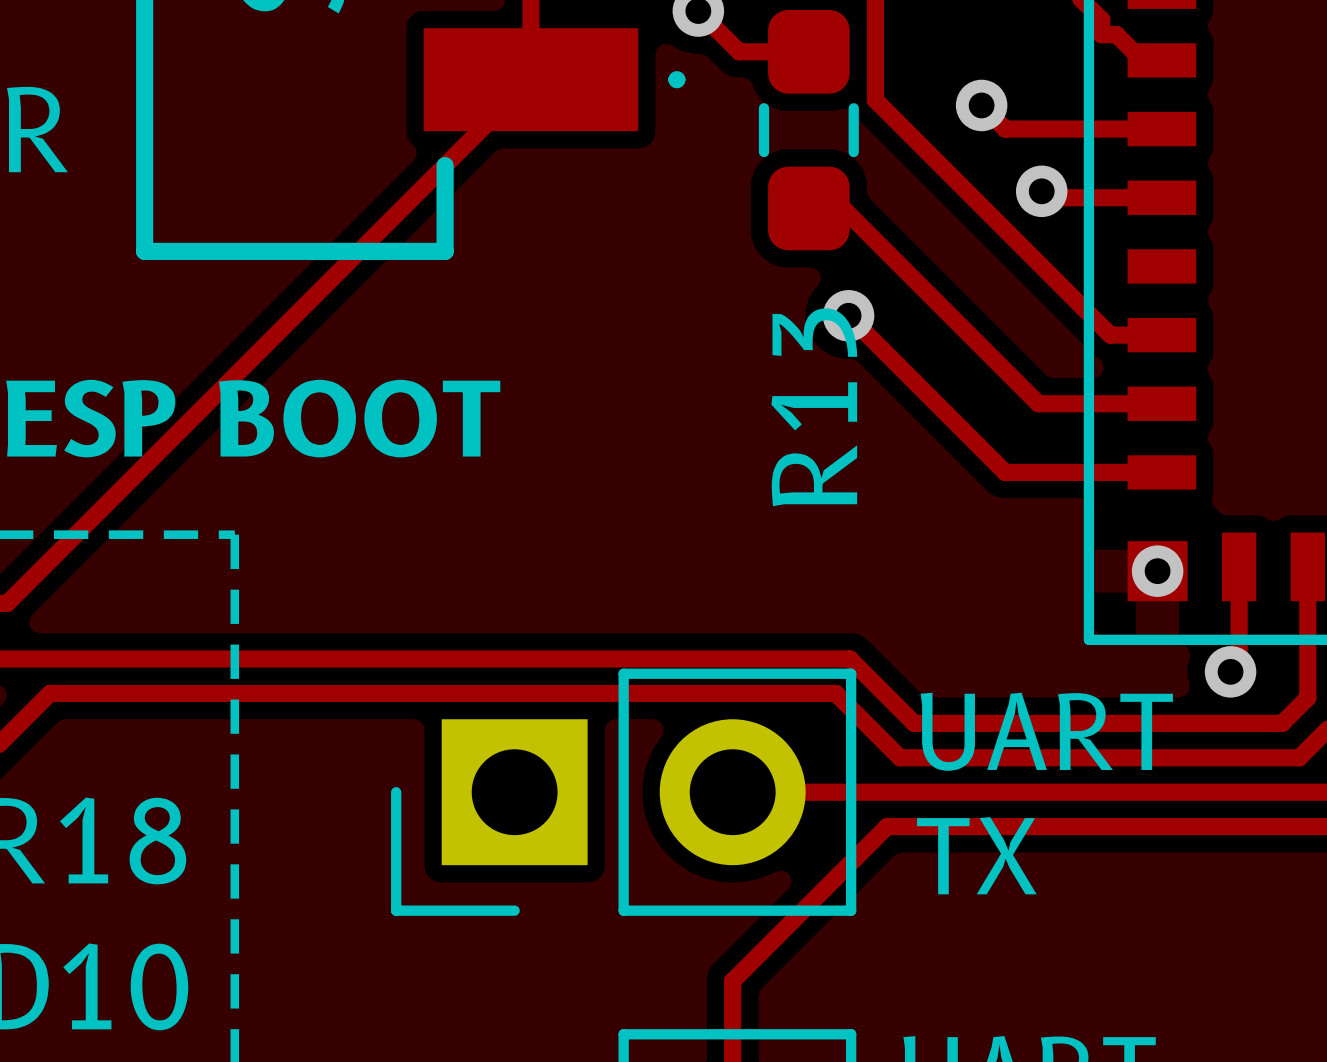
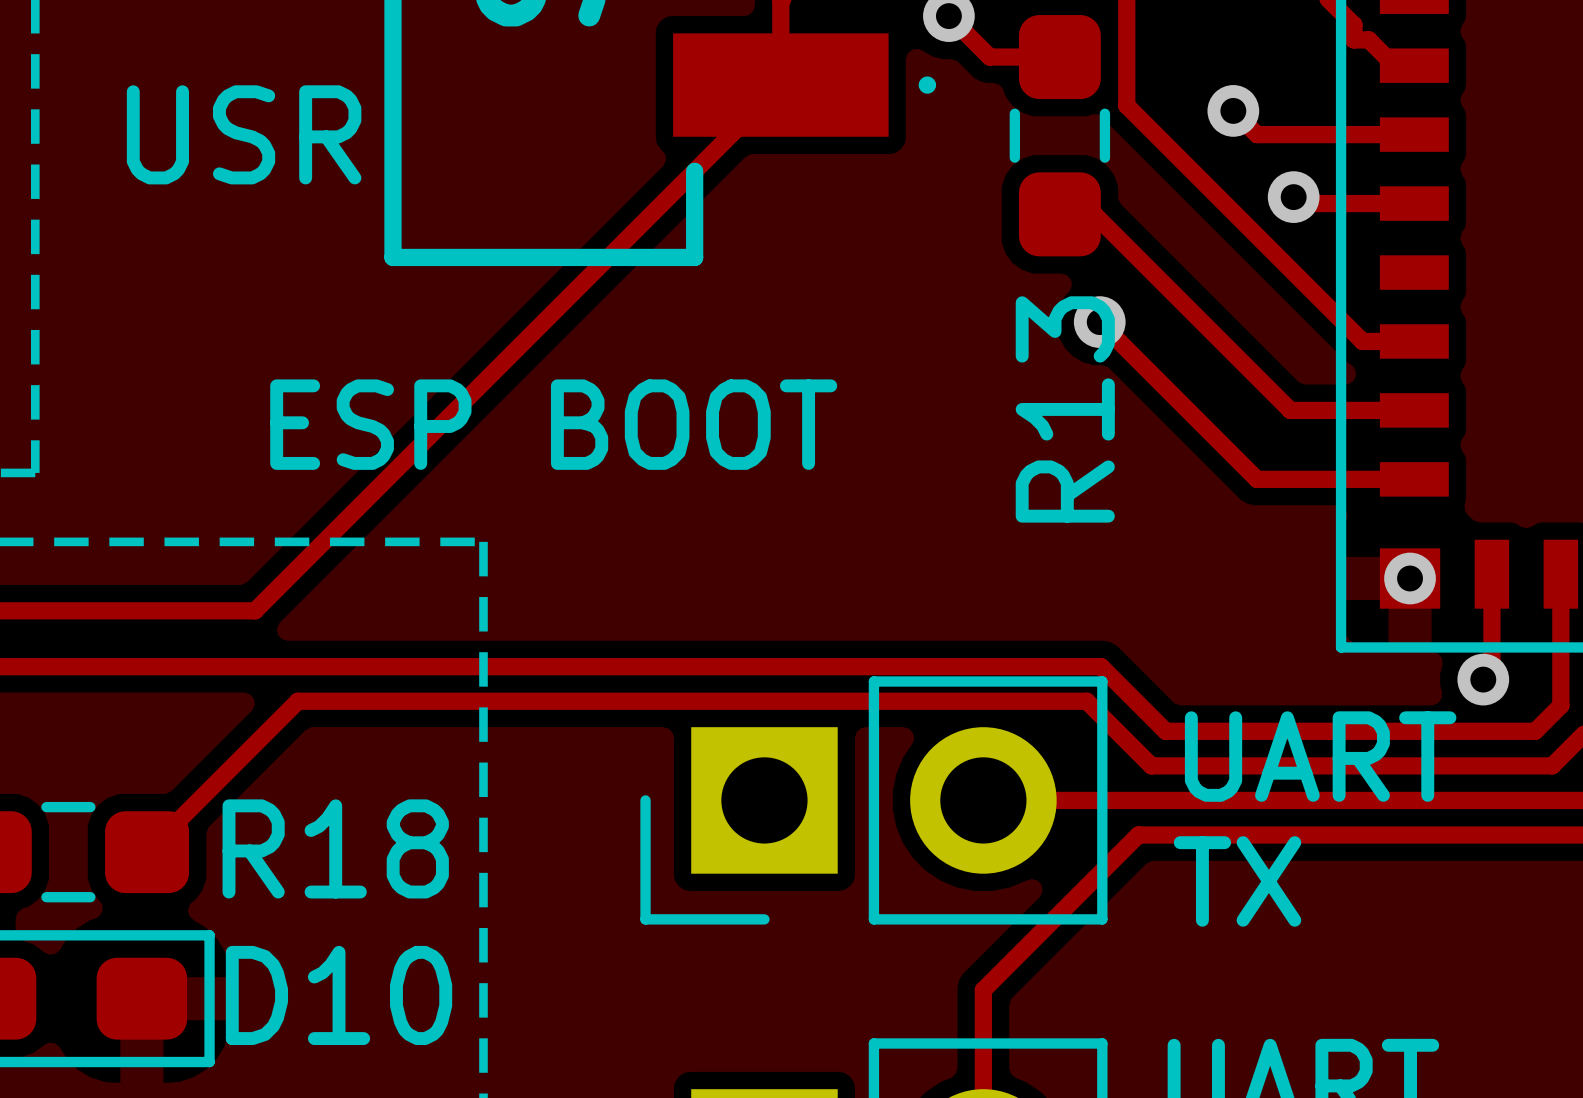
text position: UART (1046, 731) -> UART (1320, 756)
text position: TX (976, 855) -> TX (1237, 881)

